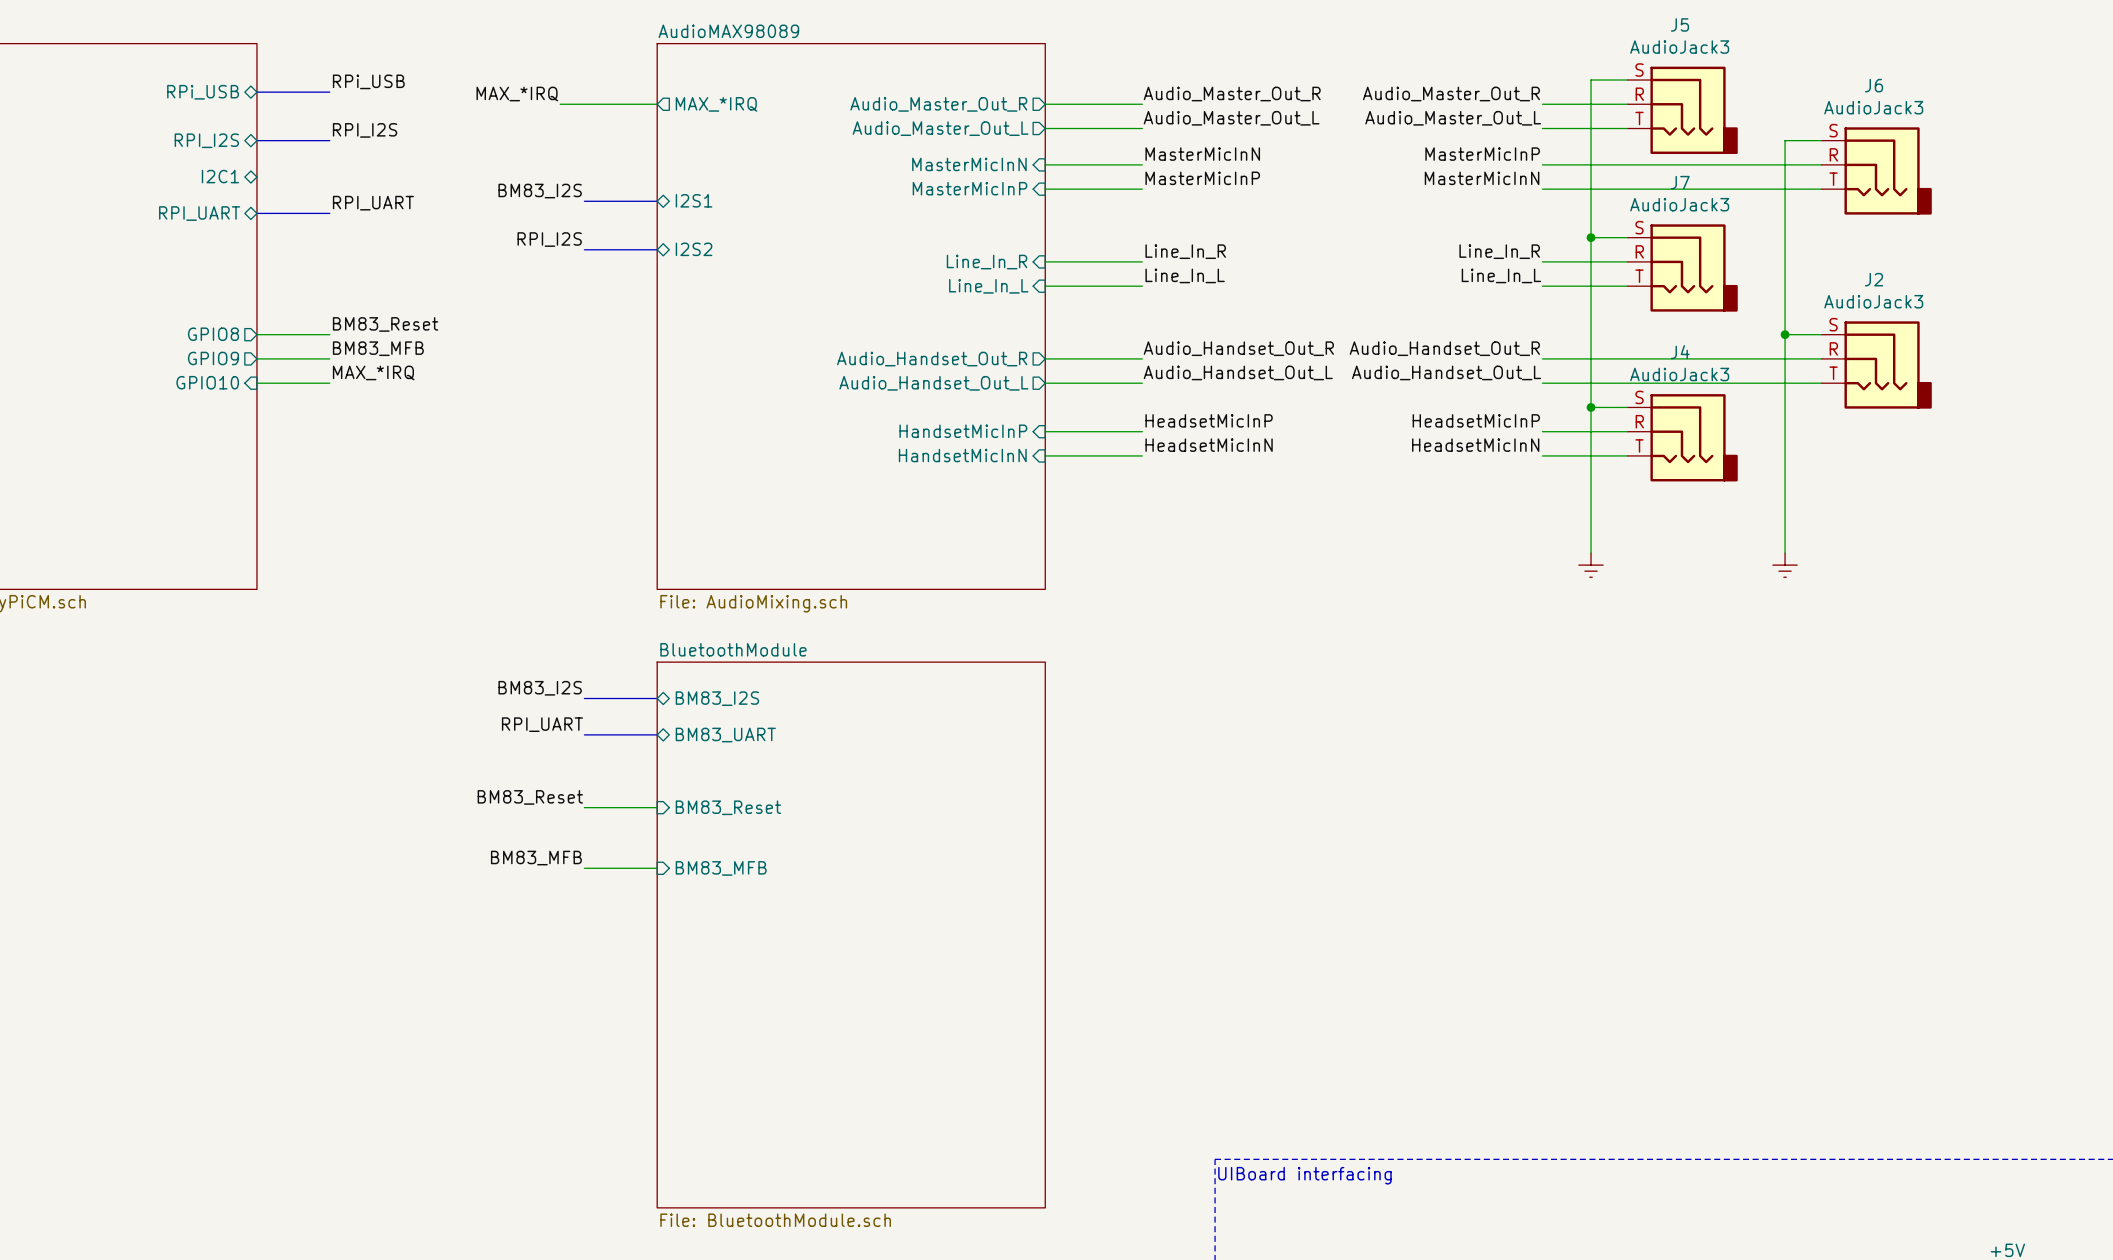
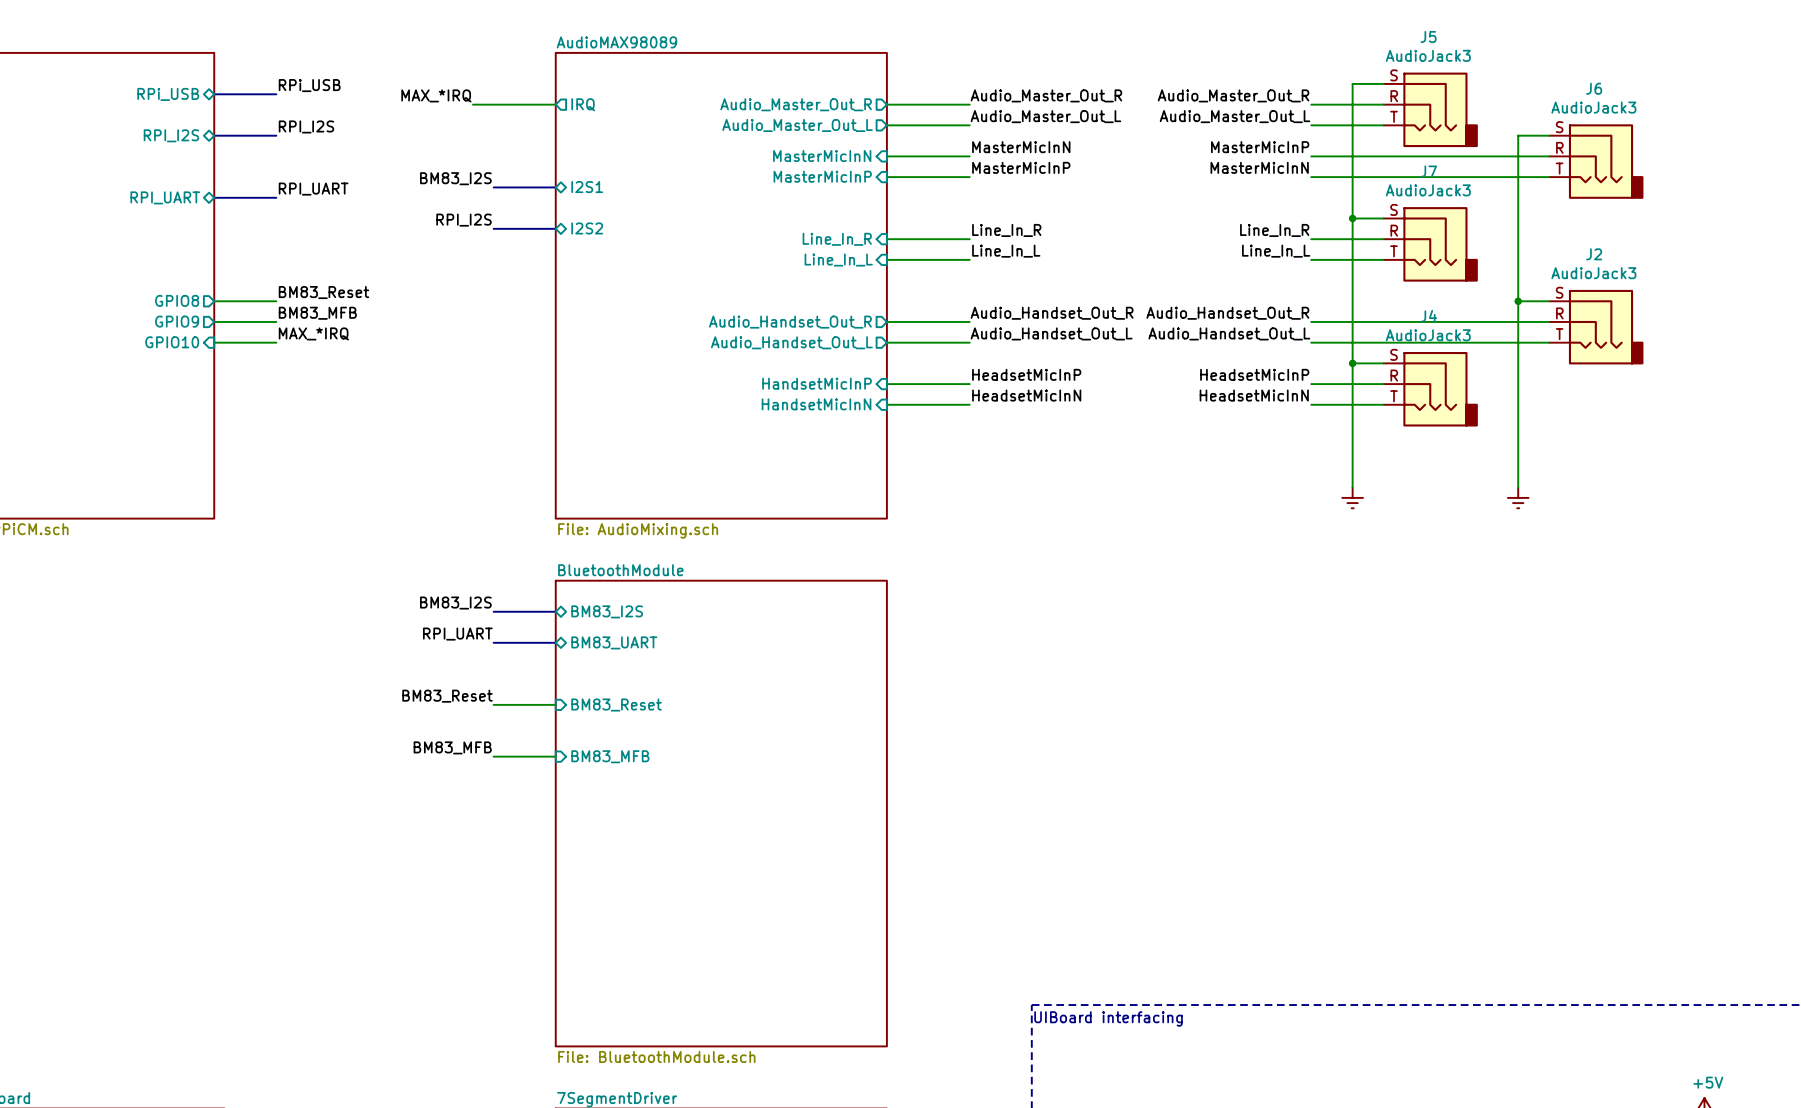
sheet pin: MAX_*IRQ (716, 104) -> IRQ (583, 104)
sheet pin: I2C1 (220, 176) -> none

